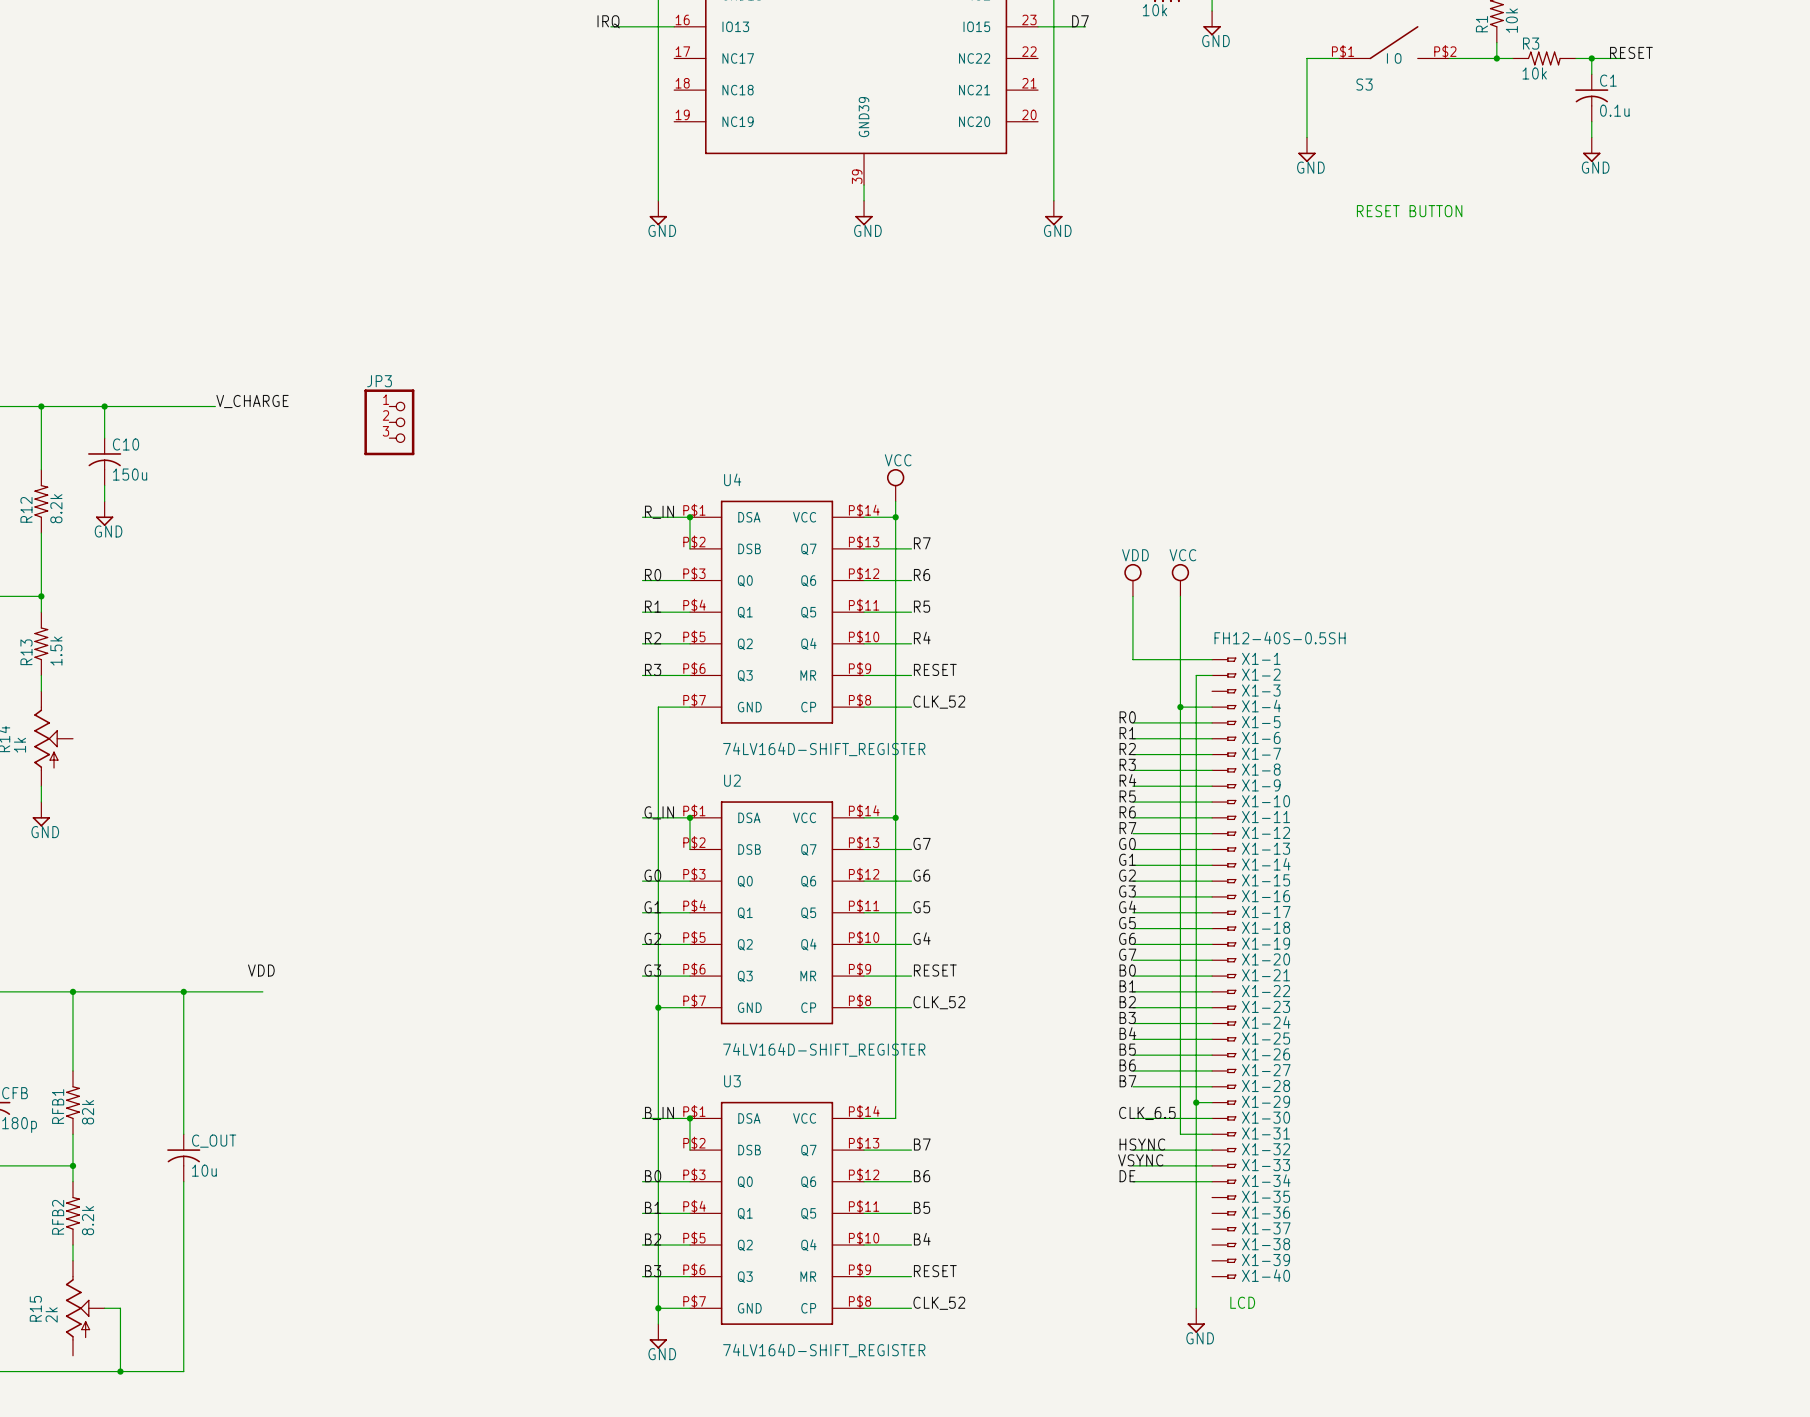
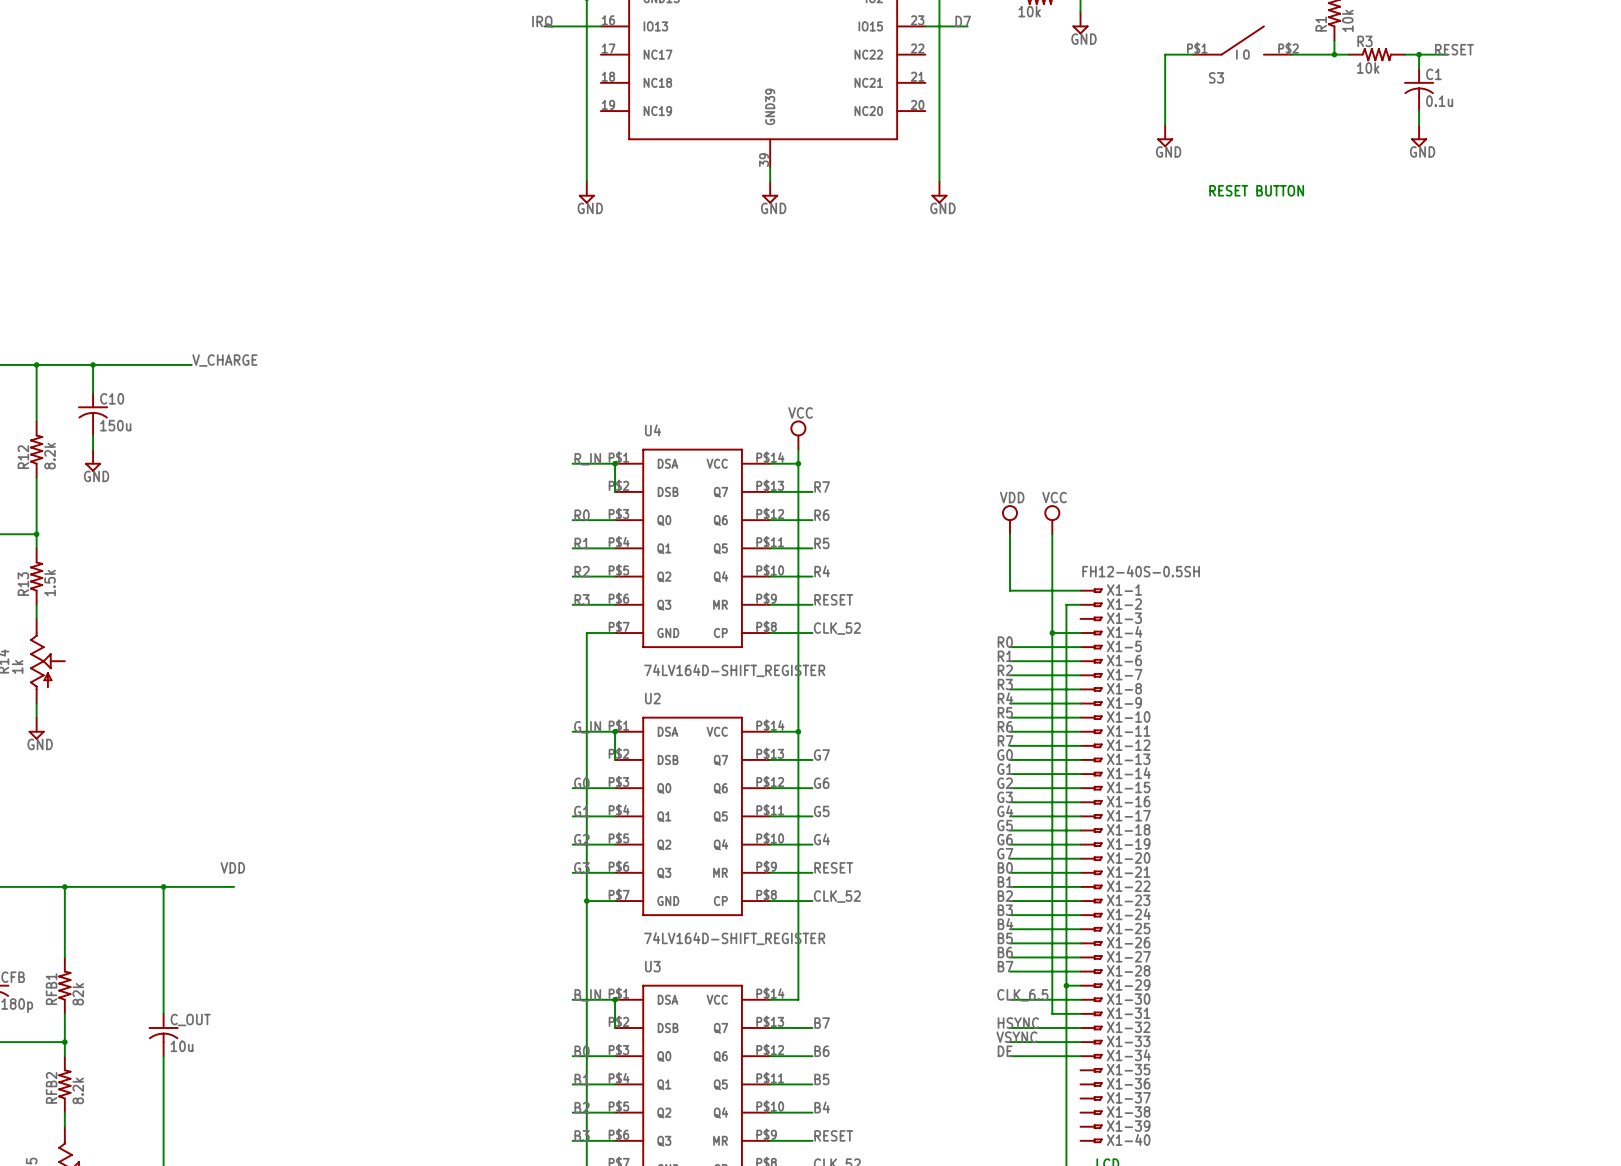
JP3: (389, 422) -> none

